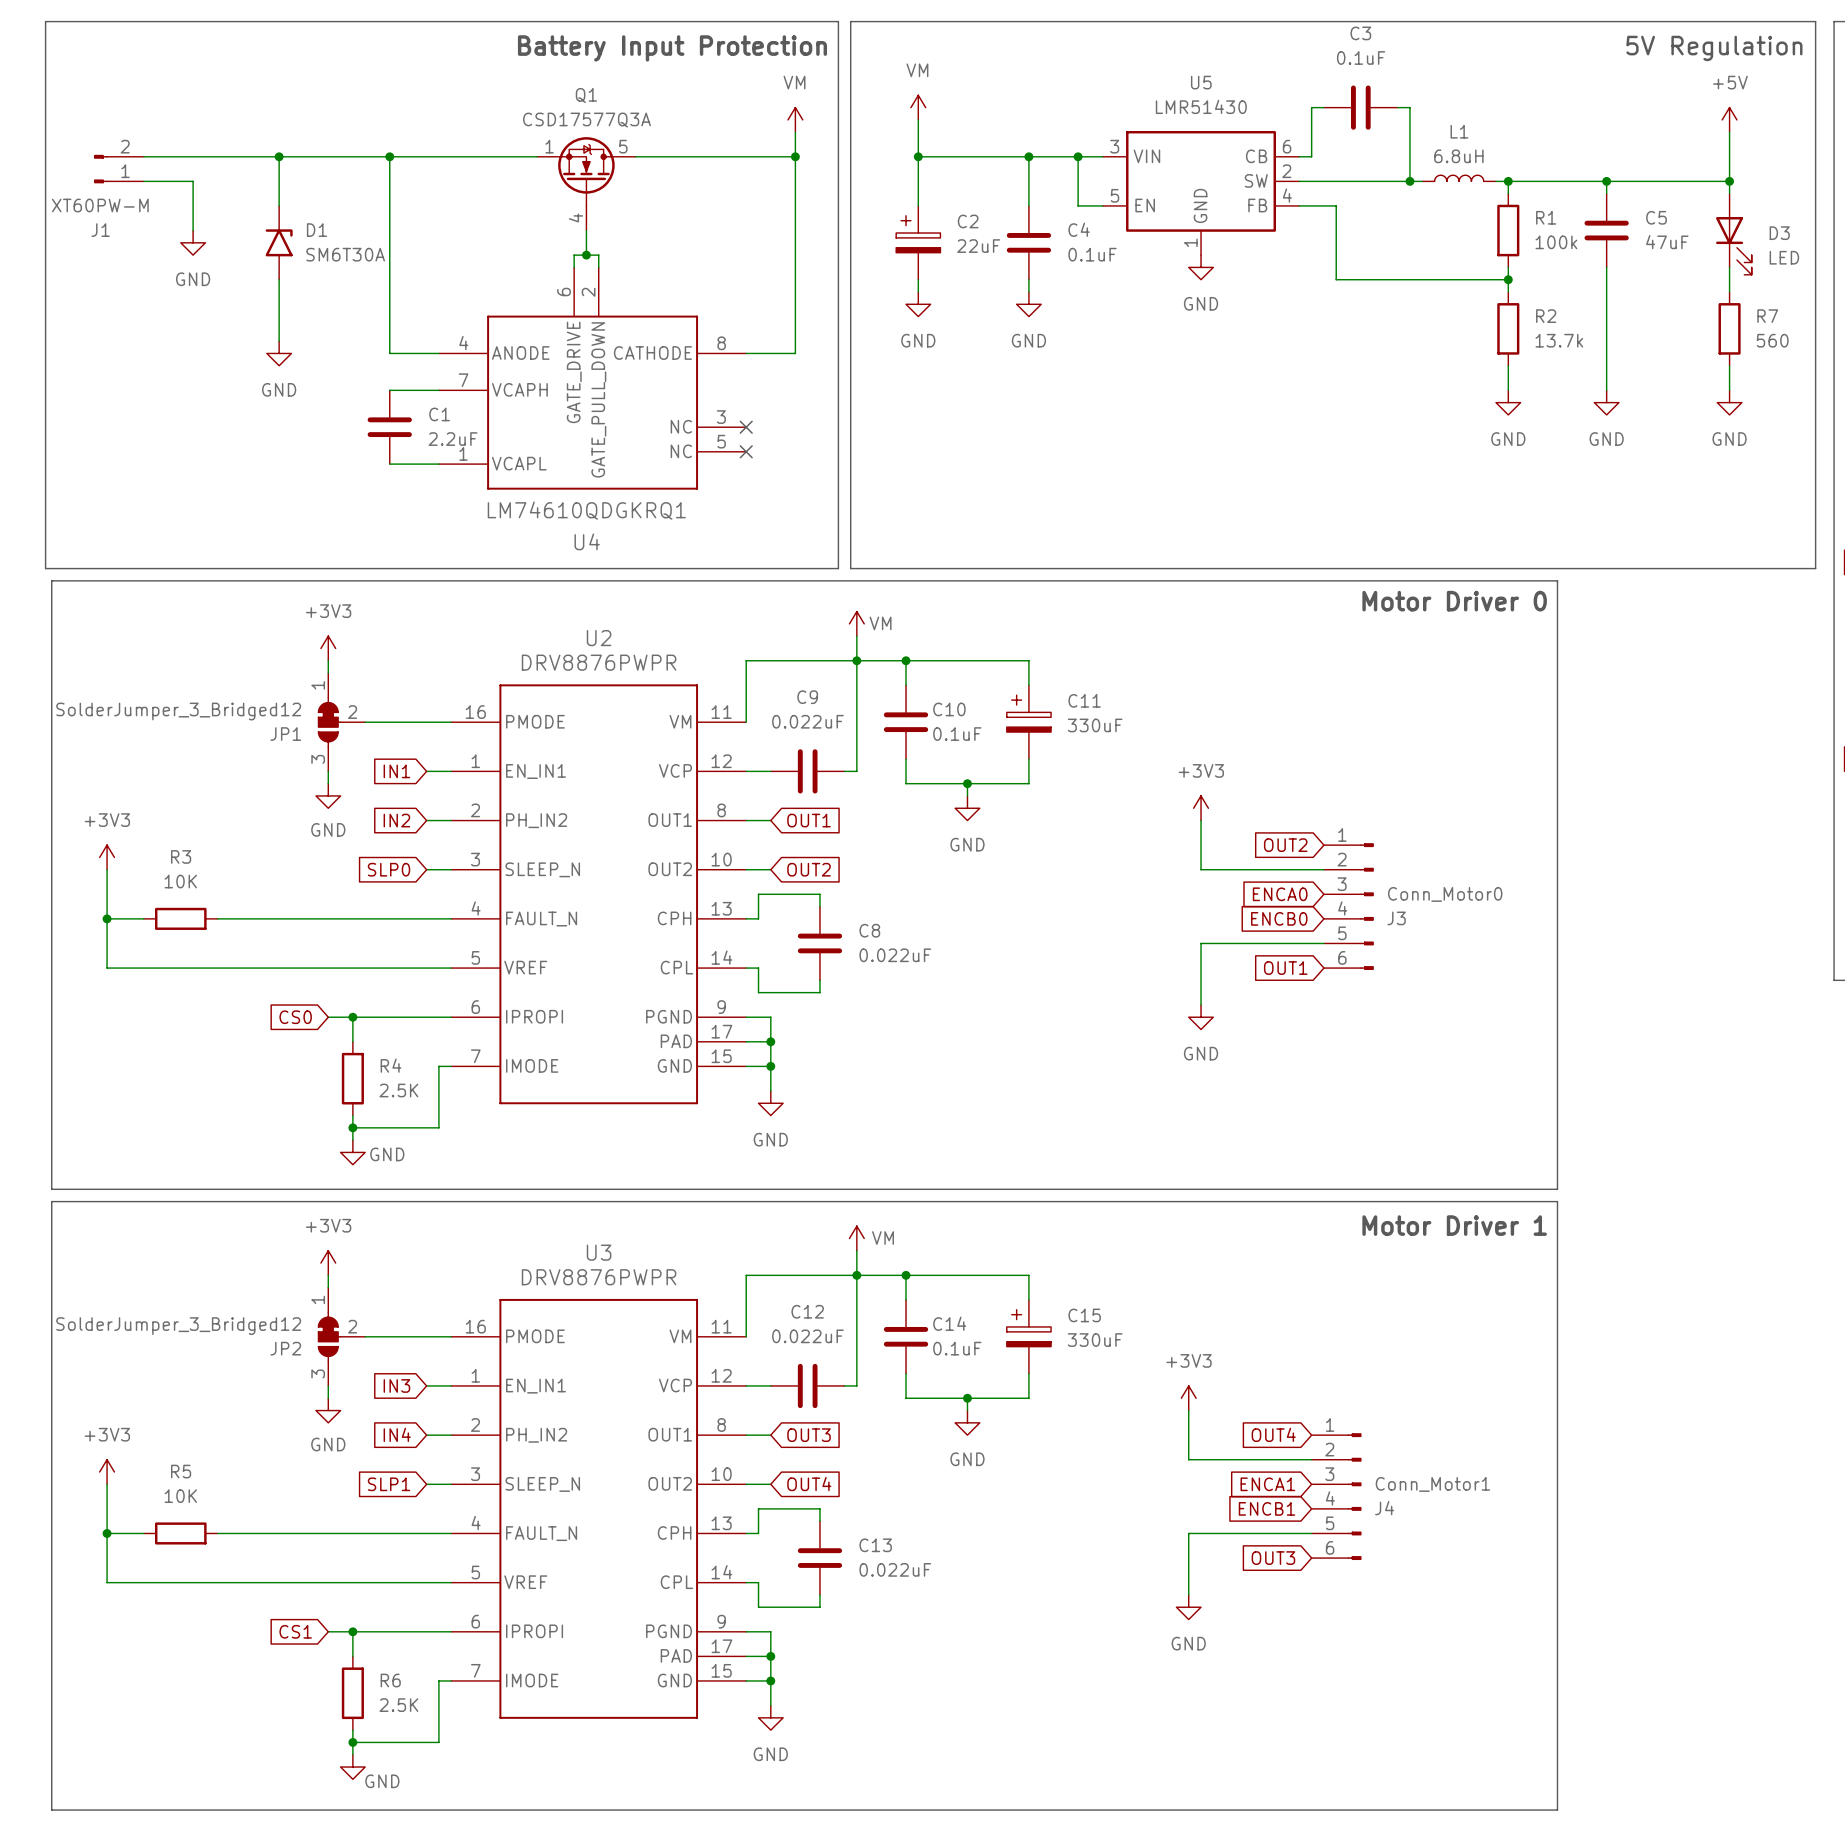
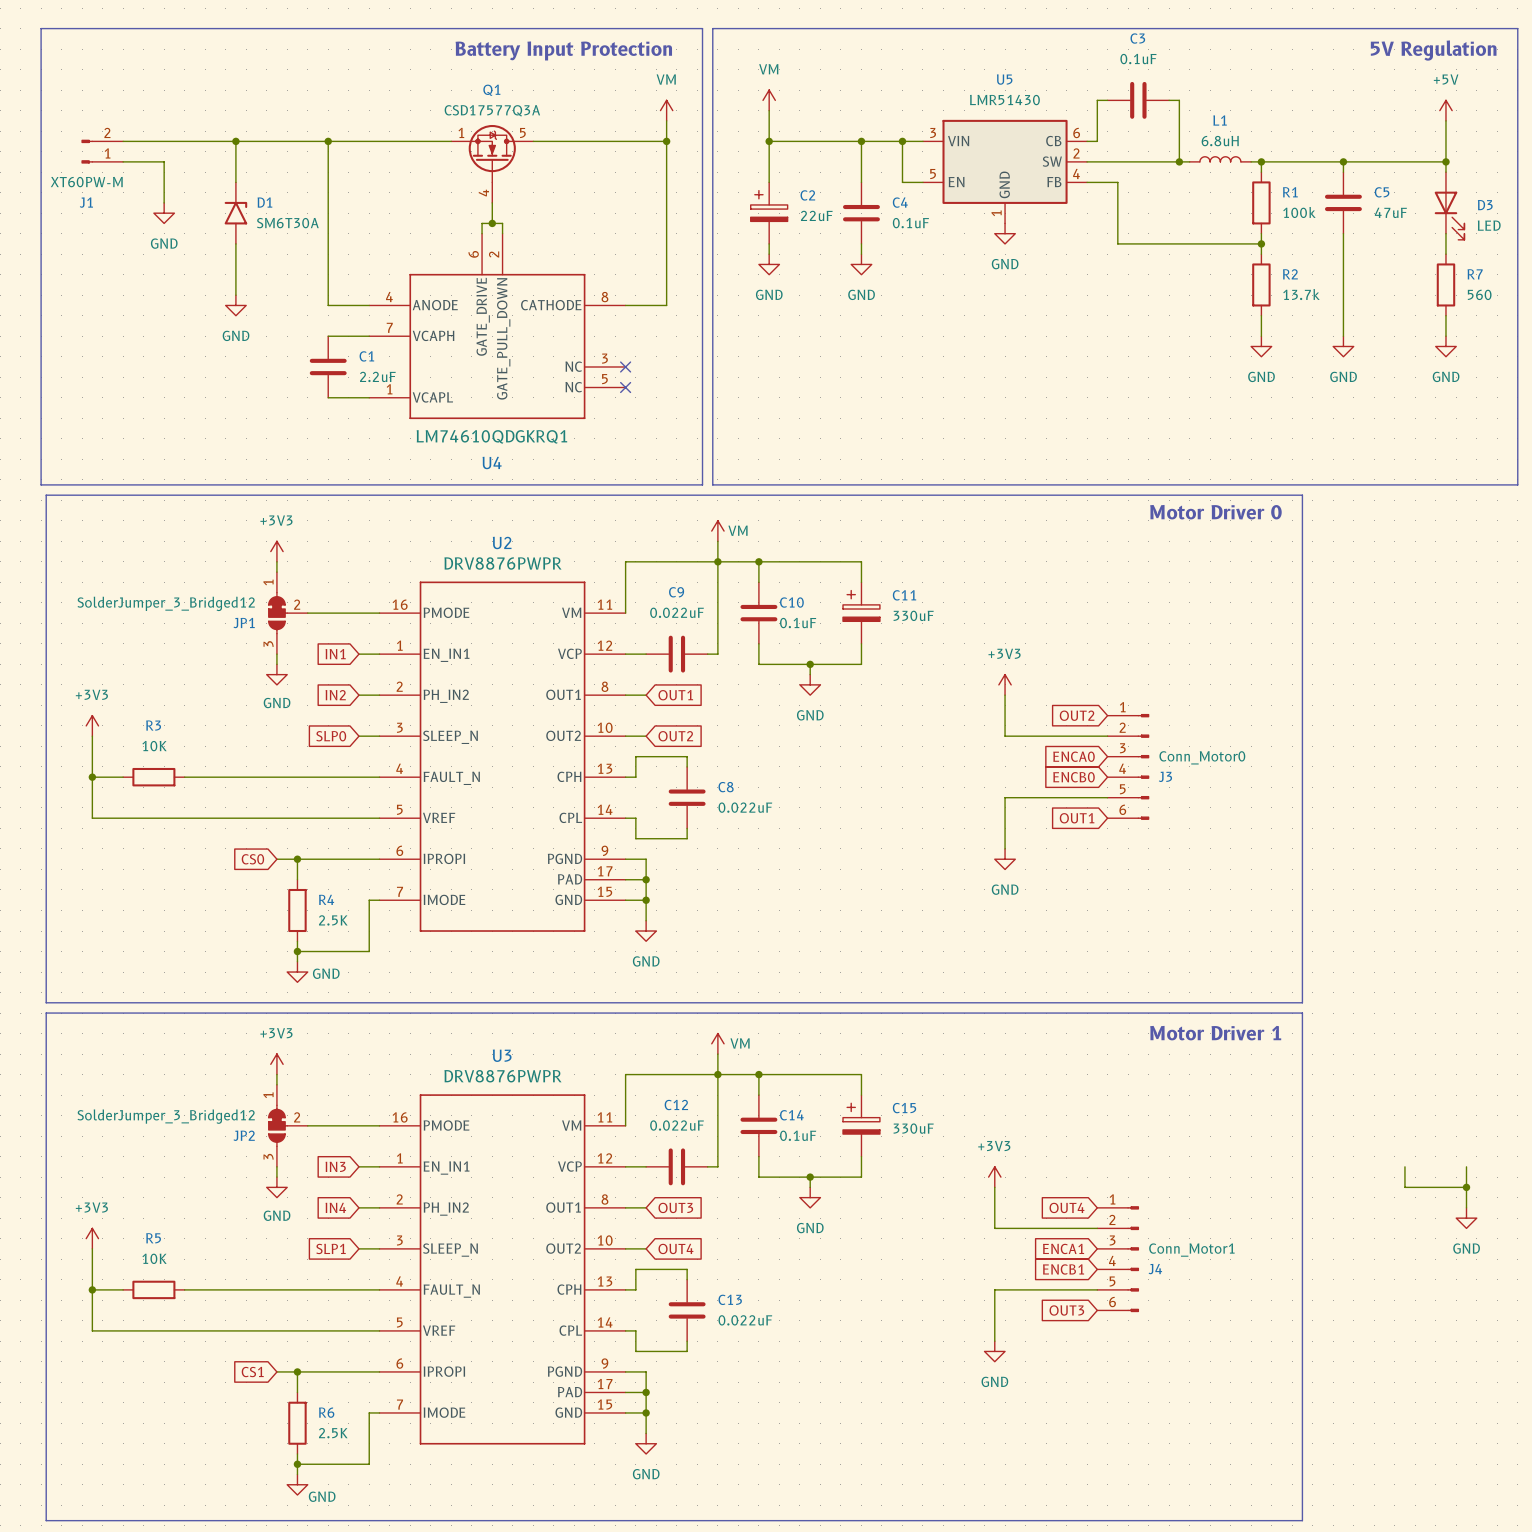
wire: none -> (1404, 1166) (1404, 1187) (1466, 1187)
wire: none -> (1466, 1166) (1466, 1207)
junction: none -> (1466, 1187)
power symbol: none -> GND (1466, 1218)

